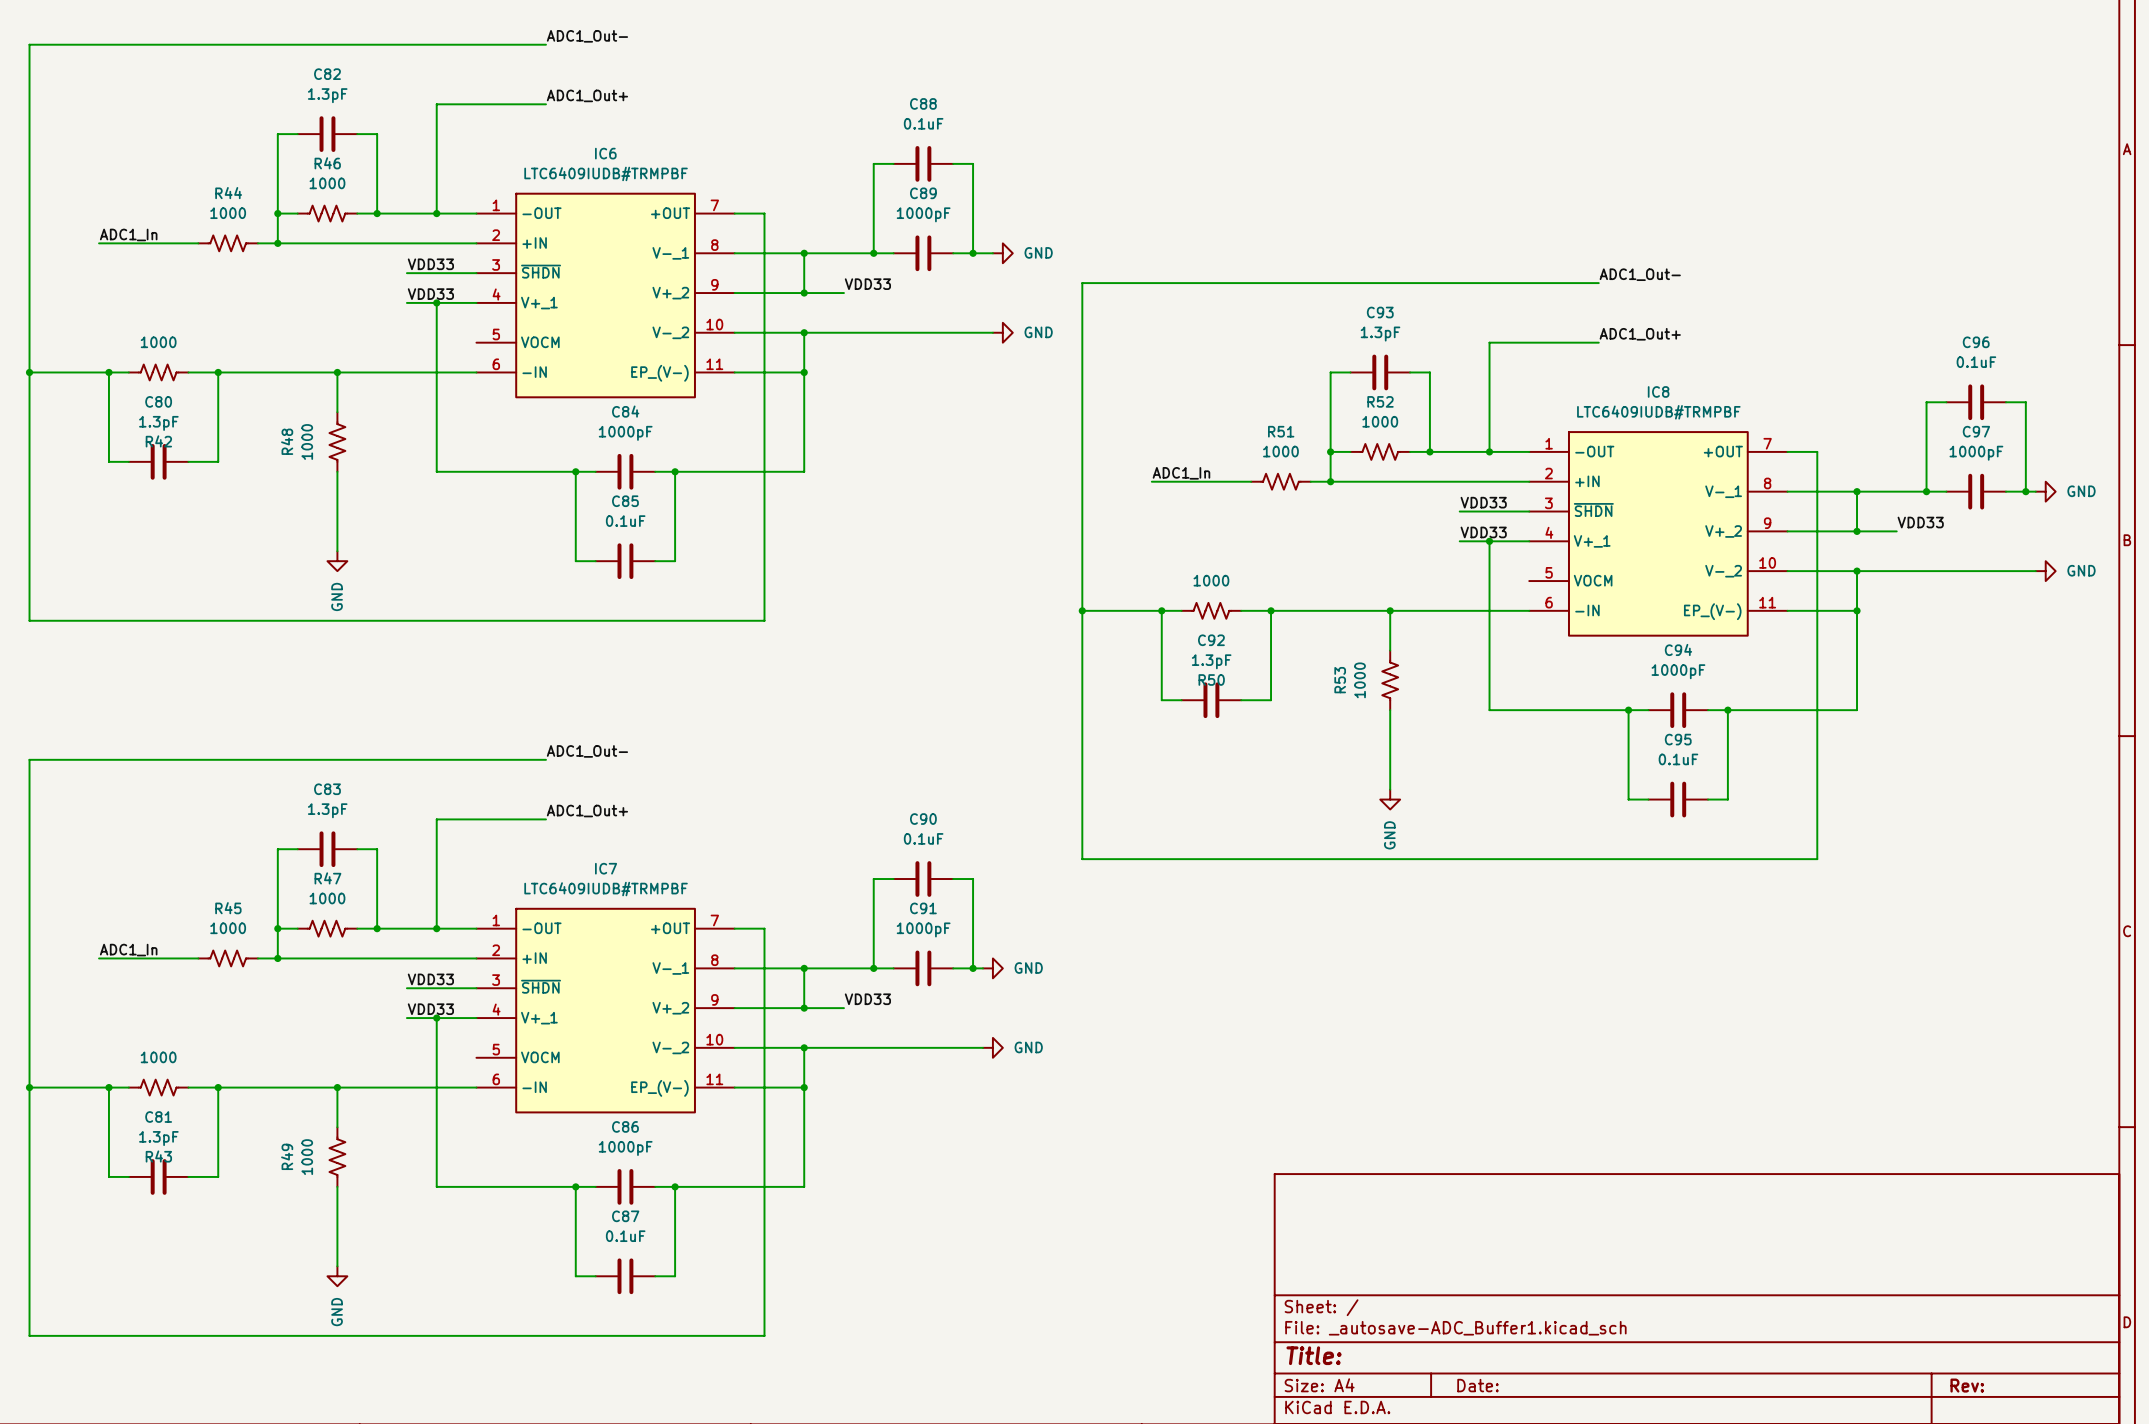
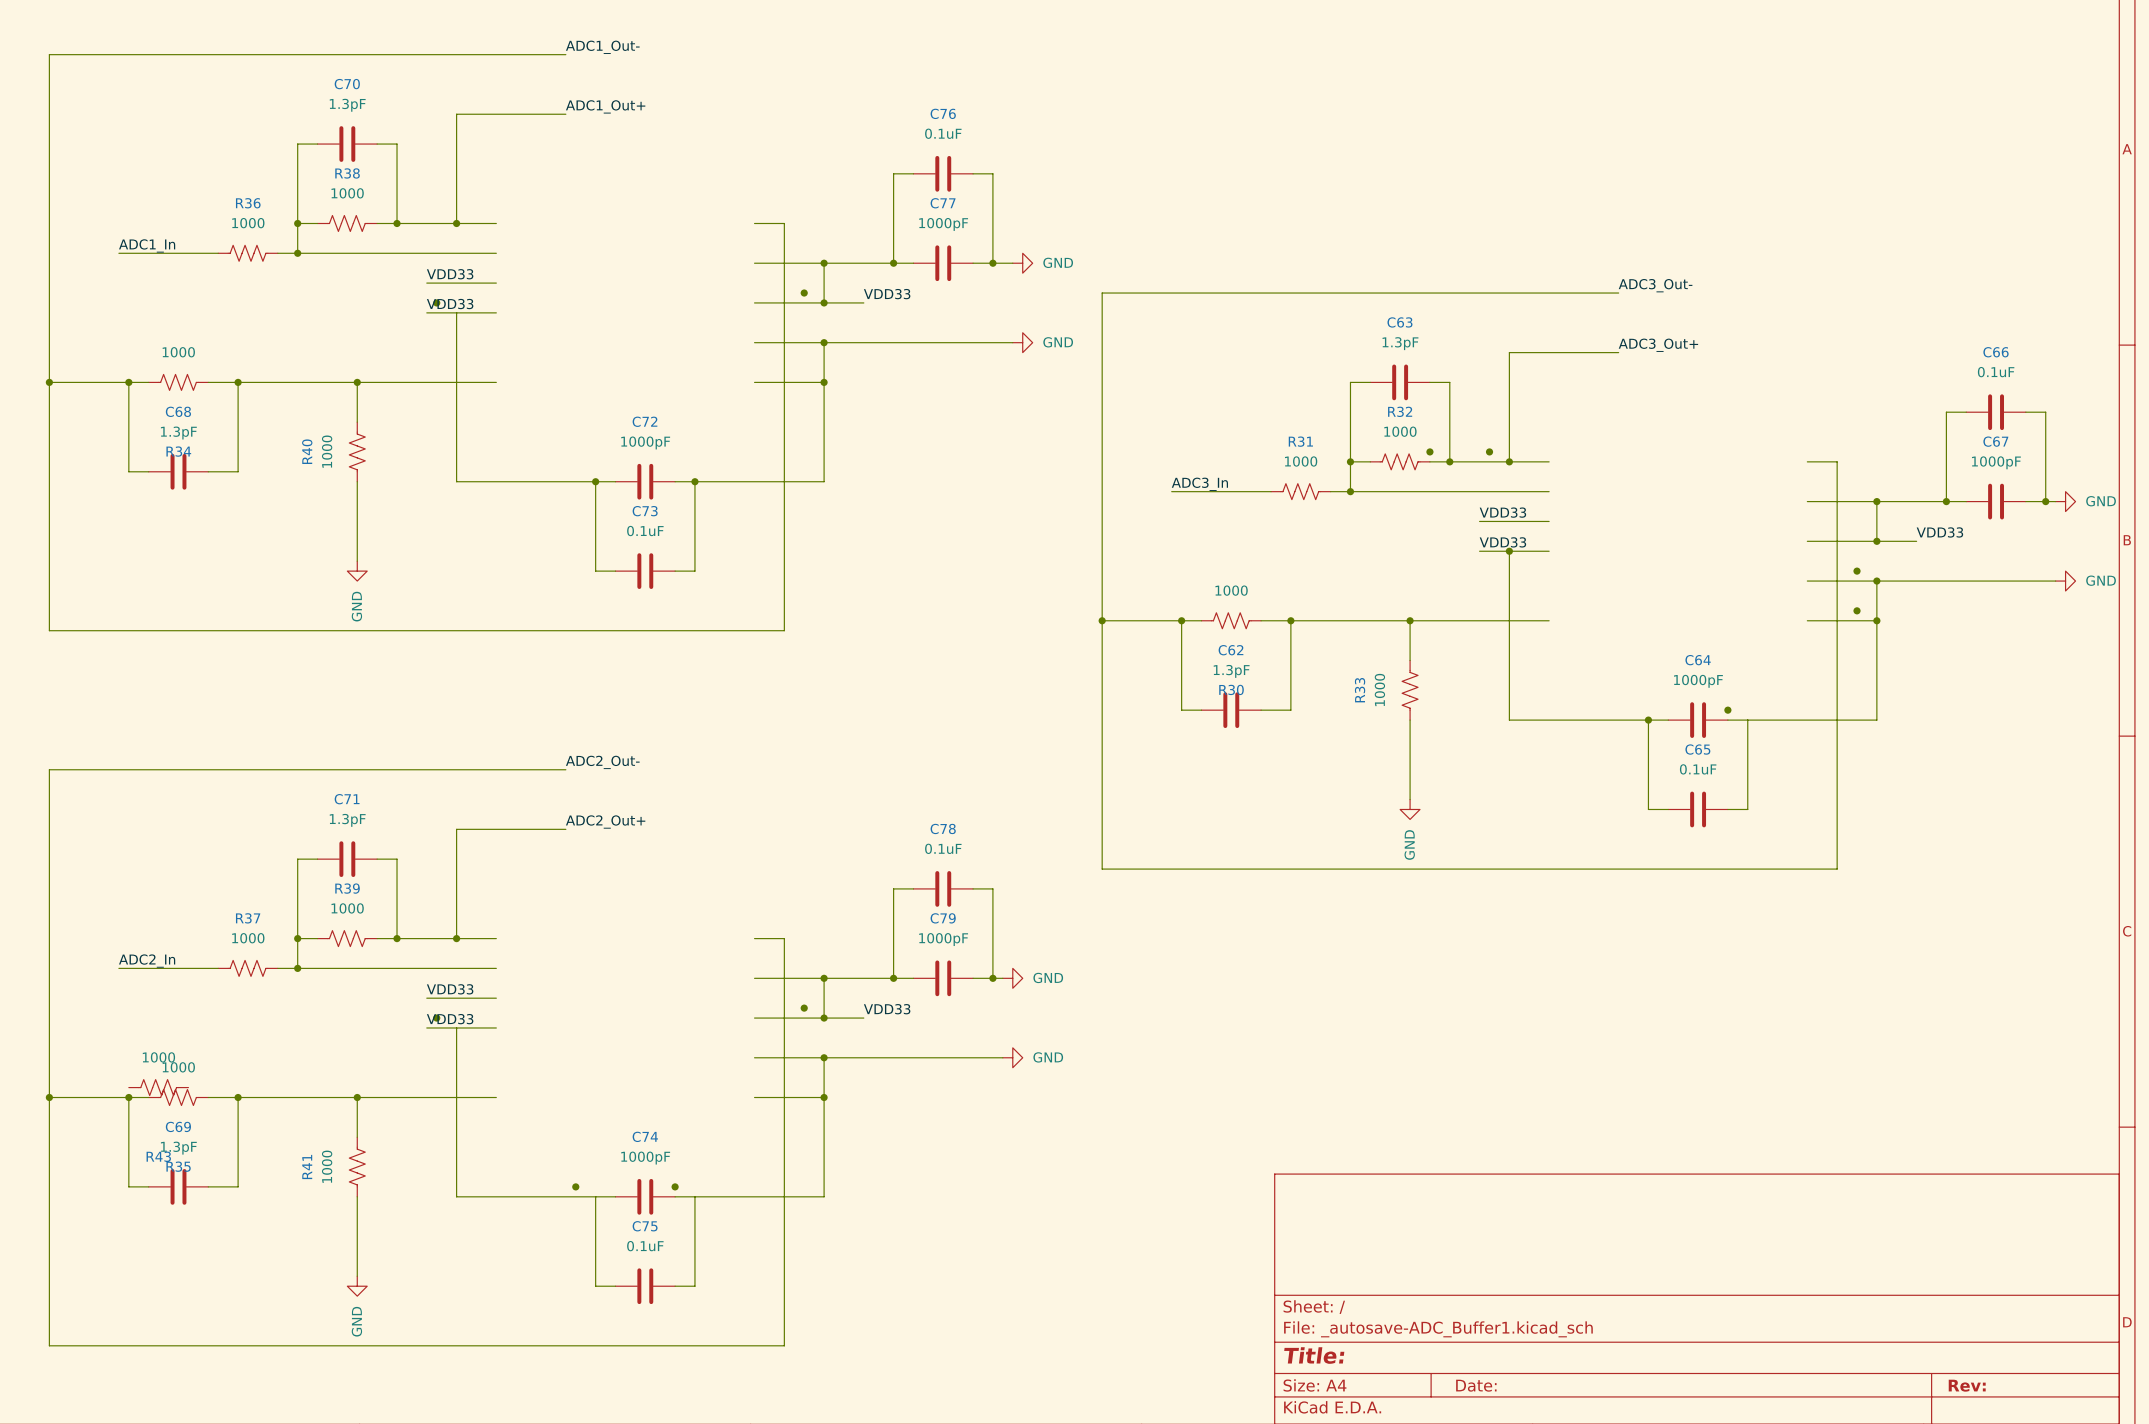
label position: ADC1_Out- (587, 36) -> ADC1_Out- (602, 47)
wire: (545, 44) (29, 44) (29, 620) (764, 620) (764, 213) (734, 213) -> (565, 54) (49, 54) (49, 630) (784, 630) (784, 223) (754, 223)
label position: ADC1_Out+ (587, 95) -> ADC1_Out+ (605, 106)
wire: (545, 104) (436, 104) (436, 213) -> (565, 114) (456, 114) (456, 223)
wire: (297, 134) (277, 134) (277, 243) -> (317, 144) (297, 144) (297, 253)
C82: 1.3pF (327, 134) -> none
wire: (357, 134) (377, 134) (377, 213) -> (377, 144) (397, 144) (397, 223)
C70: none -> 1.3pF (347, 144)
wire: (893, 163) (873, 163) (873, 253) -> (913, 173) (893, 173) (893, 263)
C88: 0.1uF (923, 163) -> none
wire: (953, 163) (973, 163) (973, 253) -> (973, 173) (992, 173) (992, 263)
C76: none -> 0.1uF (943, 173)
wire: (277, 213) (297, 213) -> (297, 223) (317, 223)
junction: (277, 213) -> none
R46: 1000 (327, 213) -> none
wire: (357, 213) (476, 213) -> (377, 223) (496, 223)
junction: (377, 213) -> none
junction: (436, 213) -> none
junction: none -> (297, 223)
R38: none -> 1000 (347, 223)
junction: none -> (397, 223)
junction: none -> (456, 223)
label position: ADC1_In (128, 234) -> ADC1_In (147, 245)
wire: (99, 243) (198, 243) -> (118, 253) (218, 253)
R44: 1000 (228, 243) -> none
wire: (257, 243) (476, 243) -> (277, 253) (496, 253)
junction: (277, 243) -> none
R36: none -> 1000 (248, 253)
junction: none -> (297, 253)
wire: (734, 253) (893, 253) -> (754, 263) (913, 263)
wire: (804, 253) (804, 293) -> (824, 263) (824, 302)
junction position: (804, 253) -> (824, 263)
junction position: (873, 253) -> (893, 263)
C89: 1000pF (923, 253) -> none
wire: (953, 253) (992, 253) -> (973, 263) (1012, 263)
junction position: (973, 253) -> (992, 263)
power symbol position: GND (1002, 253) -> GND (1022, 263)
C77: none -> 1000pF (943, 263)
label: VDD33 (430, 264) -> none
wire: (406, 273) (476, 273) -> (426, 283) (496, 283)
label: none -> VDD33 (450, 274)
label: ADC1_Out- (1640, 274) -> ADC3_Out- (1655, 285)
wire: (1598, 283) (1082, 283) (1082, 859) (1817, 859) (1817, 451) (1787, 451) -> (1618, 293) (1102, 293) (1102, 869) (1837, 869) (1837, 461) (1807, 461)
label position: VDD33 (867, 284) -> VDD33 (887, 294)
wire: (734, 293) (843, 293) -> (754, 302) (863, 302)
label: VDD33 (430, 294) -> none
IC6: LTC6409IUDB#TRMPBF (605, 295) -> none
wire: (406, 302) (476, 302) -> (426, 312) (496, 312)
wire: (436, 302) (436, 471) (595, 471) -> (456, 312) (456, 481) (615, 481)
junction: none -> (824, 302)
label: none -> VDD33 (450, 304)
wire: (734, 332) (992, 332) -> (754, 342) (1012, 342)
wire: (804, 332) (804, 471) (655, 471) -> (824, 342) (824, 481) (675, 481)
junction: (804, 332) -> none
power symbol position: GND (1002, 332) -> GND (1022, 342)
label: ADC1_Out+ (1640, 334) -> ADC3_Out+ (1658, 345)
junction: none -> (824, 342)
wire: (1598, 342) (1489, 342) (1489, 451) -> (1618, 352) (1509, 352) (1509, 461)
wire: (29, 372) (128, 372) -> (49, 382) (148, 382)
junction position: (29, 372) -> (49, 382)
wire: (108, 372) (108, 461) (128, 461) -> (128, 382) (128, 471) (148, 471)
junction position: (108, 372) -> (128, 382)
R42: 1000 (158, 372) -> none
wire: (188, 372) (476, 372) -> (208, 382) (496, 382)
wire: (218, 372) (218, 461) (188, 461) -> (238, 382) (238, 471) (208, 471)
junction position: (218, 372) -> (238, 382)
wire: (337, 372) (337, 412) -> (357, 382) (357, 422)
junction position: (337, 372) -> (357, 382)
wire: (734, 372) (804, 372) -> (754, 382) (824, 382)
junction: (804, 372) -> none
wire: (1350, 372) (1330, 372) (1330, 481) -> (1370, 382) (1350, 382) (1350, 491)
C93: 1.3pF (1380, 372) -> none
wire: (1410, 372) (1429, 372) (1429, 451) -> (1429, 382) (1449, 382) (1449, 461)
R34: none -> 1000 (178, 382)
junction: none -> (824, 382)
C63: none -> 1.3pF (1400, 382)
wire: (1946, 402) (1926, 402) (1926, 491) -> (1966, 412) (1946, 412) (1946, 501)
C96: 0.1uF (1976, 402) -> none
wire: (2005, 402) (2025, 402) (2025, 491) -> (2025, 412) (2045, 412) (2045, 501)
C66: none -> 0.1uF (1996, 412)
R48: 1000 (337, 442) -> none
R40: none -> 1000 (357, 451)
wire: (1330, 451) (1350, 451) -> (1350, 461) (1370, 461)
junction: (1330, 451) -> none
R52: 1000 (1380, 451) -> none
wire: (1410, 451) (1529, 451) -> (1429, 461) (1549, 461)
C80: 1.3pF (158, 461) -> none
junction: none -> (1350, 461)
R32: none -> 1000 (1400, 461)
junction: none -> (1449, 461)
junction: none -> (1509, 461)
C68: none -> 1.3pF (178, 471)
wire: (337, 471) (337, 551) -> (357, 481) (357, 561)
wire: (575, 471) (575, 561) (595, 561) -> (595, 481) (595, 571) (615, 571)
junction position: (575, 471) -> (595, 481)
C84: 1000pF (625, 471) -> none
wire: (675, 471) (675, 561) (655, 561) -> (694, 481) (694, 571) (675, 571)
junction position: (675, 471) -> (694, 481)
label: ADC1_In (1181, 473) -> ADC3_In (1199, 484)
C72: none -> 1000pF (645, 481)
wire: (1151, 481) (1251, 481) -> (1171, 491) (1271, 491)
R51: 1000 (1280, 481) -> none
wire: (1310, 481) (1529, 481) -> (1330, 491) (1549, 491)
junction: (1330, 481) -> none
R31: none -> 1000 (1300, 491)
junction: none -> (1350, 491)
wire: (1787, 491) (1946, 491) -> (1807, 501) (1966, 501)
wire: (1857, 491) (1857, 531) -> (1876, 501) (1876, 541)
junction: (1857, 491) -> none
junction position: (1926, 491) -> (1946, 501)
C97: 1000pF (1976, 491) -> none
wire: (2005, 491) (2035, 491) -> (2025, 501) (2055, 501)
junction position: (2025, 491) -> (2045, 501)
power symbol position: GND (2045, 491) -> GND (2065, 501)
junction: none -> (1876, 501)
C67: none -> 1000pF (1996, 501)
label: VDD33 (1483, 502) -> none
wire: (1459, 511) (1529, 511) -> (1479, 521) (1549, 521)
label: none -> VDD33 (1502, 512)
label position: VDD33 (1920, 522) -> VDD33 (1939, 532)
wire: (1787, 531) (1896, 531) -> (1807, 541) (1916, 541)
junction: (1857, 531) -> none
label: VDD33 (1483, 532) -> none
IC8: LTC6409IUDB#TRMPBF (1658, 533) -> none
wire: (1459, 541) (1529, 541) -> (1479, 551) (1549, 551)
wire: (1489, 541) (1489, 710) (1648, 710) -> (1509, 551) (1509, 720) (1668, 720)
junction position: (1489, 541) -> (1509, 551)
junction: none -> (1876, 541)
label: none -> VDD33 (1502, 542)
power symbol position: GND (337, 561) -> GND (357, 571)
C85: 0.1uF (625, 561) -> none
C73: none -> 0.1uF (645, 571)
wire: (1787, 571) (2035, 571) -> (1807, 581) (2055, 581)
wire: (1857, 571) (1857, 710) (1708, 710) -> (1876, 581) (1876, 720) (1727, 720)
power symbol position: GND (2045, 571) -> GND (2065, 581)
junction: none -> (1876, 581)
wire: (1082, 610) (1181, 610) -> (1102, 620) (1201, 620)
junction position: (1082, 610) -> (1102, 620)
wire: (1161, 610) (1161, 700) (1181, 700) -> (1181, 620) (1181, 710) (1201, 710)
junction position: (1161, 610) -> (1181, 620)
R50: 1000 (1211, 610) -> none
wire: (1241, 610) (1529, 610) -> (1261, 620) (1549, 620)
wire: (1271, 610) (1271, 700) (1241, 700) -> (1290, 620) (1290, 710) (1261, 710)
junction position: (1271, 610) -> (1290, 620)
wire: (1390, 610) (1390, 650) -> (1410, 620) (1410, 660)
junction position: (1390, 610) -> (1410, 620)
wire: (1787, 610) (1857, 610) -> (1807, 620) (1876, 620)
R30: none -> 1000 (1231, 620)
junction: none -> (1876, 620)
R53: 1000 (1390, 680) -> none
R33: none -> 1000 (1410, 690)
C92: 1.3pF (1211, 700) -> none
C62: none -> 1.3pF (1231, 710)
wire: (1390, 710) (1390, 789) -> (1410, 720) (1410, 799)
wire: (1628, 710) (1628, 799) (1648, 799) -> (1648, 720) (1648, 809) (1668, 809)
junction position: (1628, 710) -> (1648, 720)
C94: 1000pF (1678, 710) -> none
wire: (1727, 710) (1727, 799) (1708, 799) -> (1747, 720) (1747, 809) (1727, 809)
C64: none -> 1000pF (1698, 720)
label: ADC1_Out- (587, 751) -> ADC2_Out- (602, 762)
wire: (545, 759) (29, 759) (29, 1335) (764, 1335) (764, 928) (734, 928) -> (565, 769) (49, 769) (49, 1345) (784, 1345) (784, 938) (754, 938)
power symbol position: GND (1390, 799) -> GND (1410, 809)
C95: 0.1uF (1678, 799) -> none
C65: none -> 0.1uF (1698, 809)
label: ADC1_Out+ (587, 811) -> ADC2_Out+ (605, 822)
wire: (545, 819) (436, 819) (436, 928) -> (565, 829) (456, 829) (456, 938)
wire: (297, 849) (277, 849) (277, 958) -> (317, 859) (297, 859) (297, 968)
C83: 1.3pF (327, 849) -> none
wire: (357, 849) (377, 849) (377, 928) -> (377, 859) (397, 859) (397, 938)
C71: none -> 1.3pF (347, 859)
wire: (893, 879) (873, 879) (873, 968) -> (913, 888) (893, 888) (893, 978)
C90: 0.1uF (923, 879) -> none
wire: (953, 879) (973, 879) (973, 968) -> (973, 888) (992, 888) (992, 978)
C78: none -> 0.1uF (943, 888)
wire: (277, 928) (297, 928) -> (297, 938) (317, 938)
junction: (277, 928) -> none
R47: 1000 (327, 928) -> none
wire: (357, 928) (476, 928) -> (377, 938) (496, 938)
junction: (377, 928) -> none
junction: (436, 928) -> none
junction: none -> (297, 938)
R39: none -> 1000 (347, 938)
junction: none -> (397, 938)
junction: none -> (456, 938)
label: ADC1_In (128, 950) -> ADC2_In (147, 961)
wire: (99, 958) (198, 958) -> (118, 968) (218, 968)
R45: 1000 (228, 958) -> none
wire: (257, 958) (476, 958) -> (277, 968) (496, 968)
junction: (277, 958) -> none
R37: none -> 1000 (248, 968)
junction: none -> (297, 968)
wire: (734, 968) (893, 968) -> (754, 978) (913, 978)
wire: (804, 968) (804, 1008) -> (824, 978) (824, 1018)
junction position: (804, 968) -> (824, 978)
junction position: (873, 968) -> (893, 978)
C91: 1000pF (923, 968) -> none
wire: (953, 968) (982, 968) -> (973, 978) (1002, 978)
junction position: (973, 968) -> (992, 978)
power symbol position: GND (992, 968) -> GND (1012, 978)
C79: none -> 1000pF (943, 978)
label: VDD33 (430, 979) -> none
wire: (406, 988) (476, 988) -> (426, 998) (496, 998)
label: none -> VDD33 (450, 989)
label position: VDD33 (867, 999) -> VDD33 (887, 1009)
wire: (734, 1008) (843, 1008) -> (754, 1018) (863, 1018)
label: VDD33 (430, 1009) -> none
IC7: LTC6409IUDB#TRMPBF (605, 1010) -> none
wire: (406, 1018) (476, 1018) -> (426, 1027) (496, 1027)
wire: (436, 1018) (436, 1186) (595, 1186) -> (456, 1027) (456, 1196) (615, 1196)
junction: none -> (824, 1018)
label: none -> VDD33 (450, 1019)
wire: (734, 1047) (982, 1047) -> (754, 1057) (1002, 1057)
wire: (804, 1047) (804, 1186) (655, 1186) -> (824, 1057) (824, 1196) (675, 1196)
junction: (804, 1047) -> none
power symbol position: GND (992, 1047) -> GND (1012, 1057)
junction: none -> (824, 1057)
wire: (29, 1087) (128, 1087) -> (49, 1097) (148, 1097)
junction position: (29, 1087) -> (49, 1097)
wire: (108, 1087) (108, 1176) (128, 1176) -> (128, 1097) (128, 1186) (148, 1186)
junction position: (108, 1087) -> (128, 1097)
wire: (188, 1087) (476, 1087) -> (208, 1097) (496, 1097)
wire: (218, 1087) (218, 1176) (188, 1176) -> (238, 1097) (238, 1186) (208, 1186)
junction position: (218, 1087) -> (238, 1097)
wire: (337, 1087) (337, 1127) -> (357, 1097) (357, 1137)
junction position: (337, 1087) -> (357, 1097)
wire: (734, 1087) (804, 1087) -> (754, 1097) (824, 1097)
junction: (804, 1087) -> none
R35: none -> 1000 (178, 1097)
junction: none -> (824, 1097)
R49: 1000 (337, 1157) -> none
R41: none -> 1000 (357, 1167)
C81: 1.3pF (158, 1176) -> none
C69: none -> 1.3pF (178, 1186)
wire: (337, 1186) (337, 1266) -> (357, 1196) (357, 1276)
wire: (575, 1186) (575, 1276) (595, 1276) -> (595, 1196) (595, 1286) (615, 1286)
C86: 1000pF (625, 1186) -> none
wire: (675, 1186) (675, 1276) (655, 1276) -> (694, 1196) (694, 1286) (675, 1286)
C74: none -> 1000pF (645, 1196)
power symbol position: GND (337, 1276) -> GND (357, 1286)
C87: 0.1uF (625, 1276) -> none
C75: none -> 0.1uF (645, 1286)

